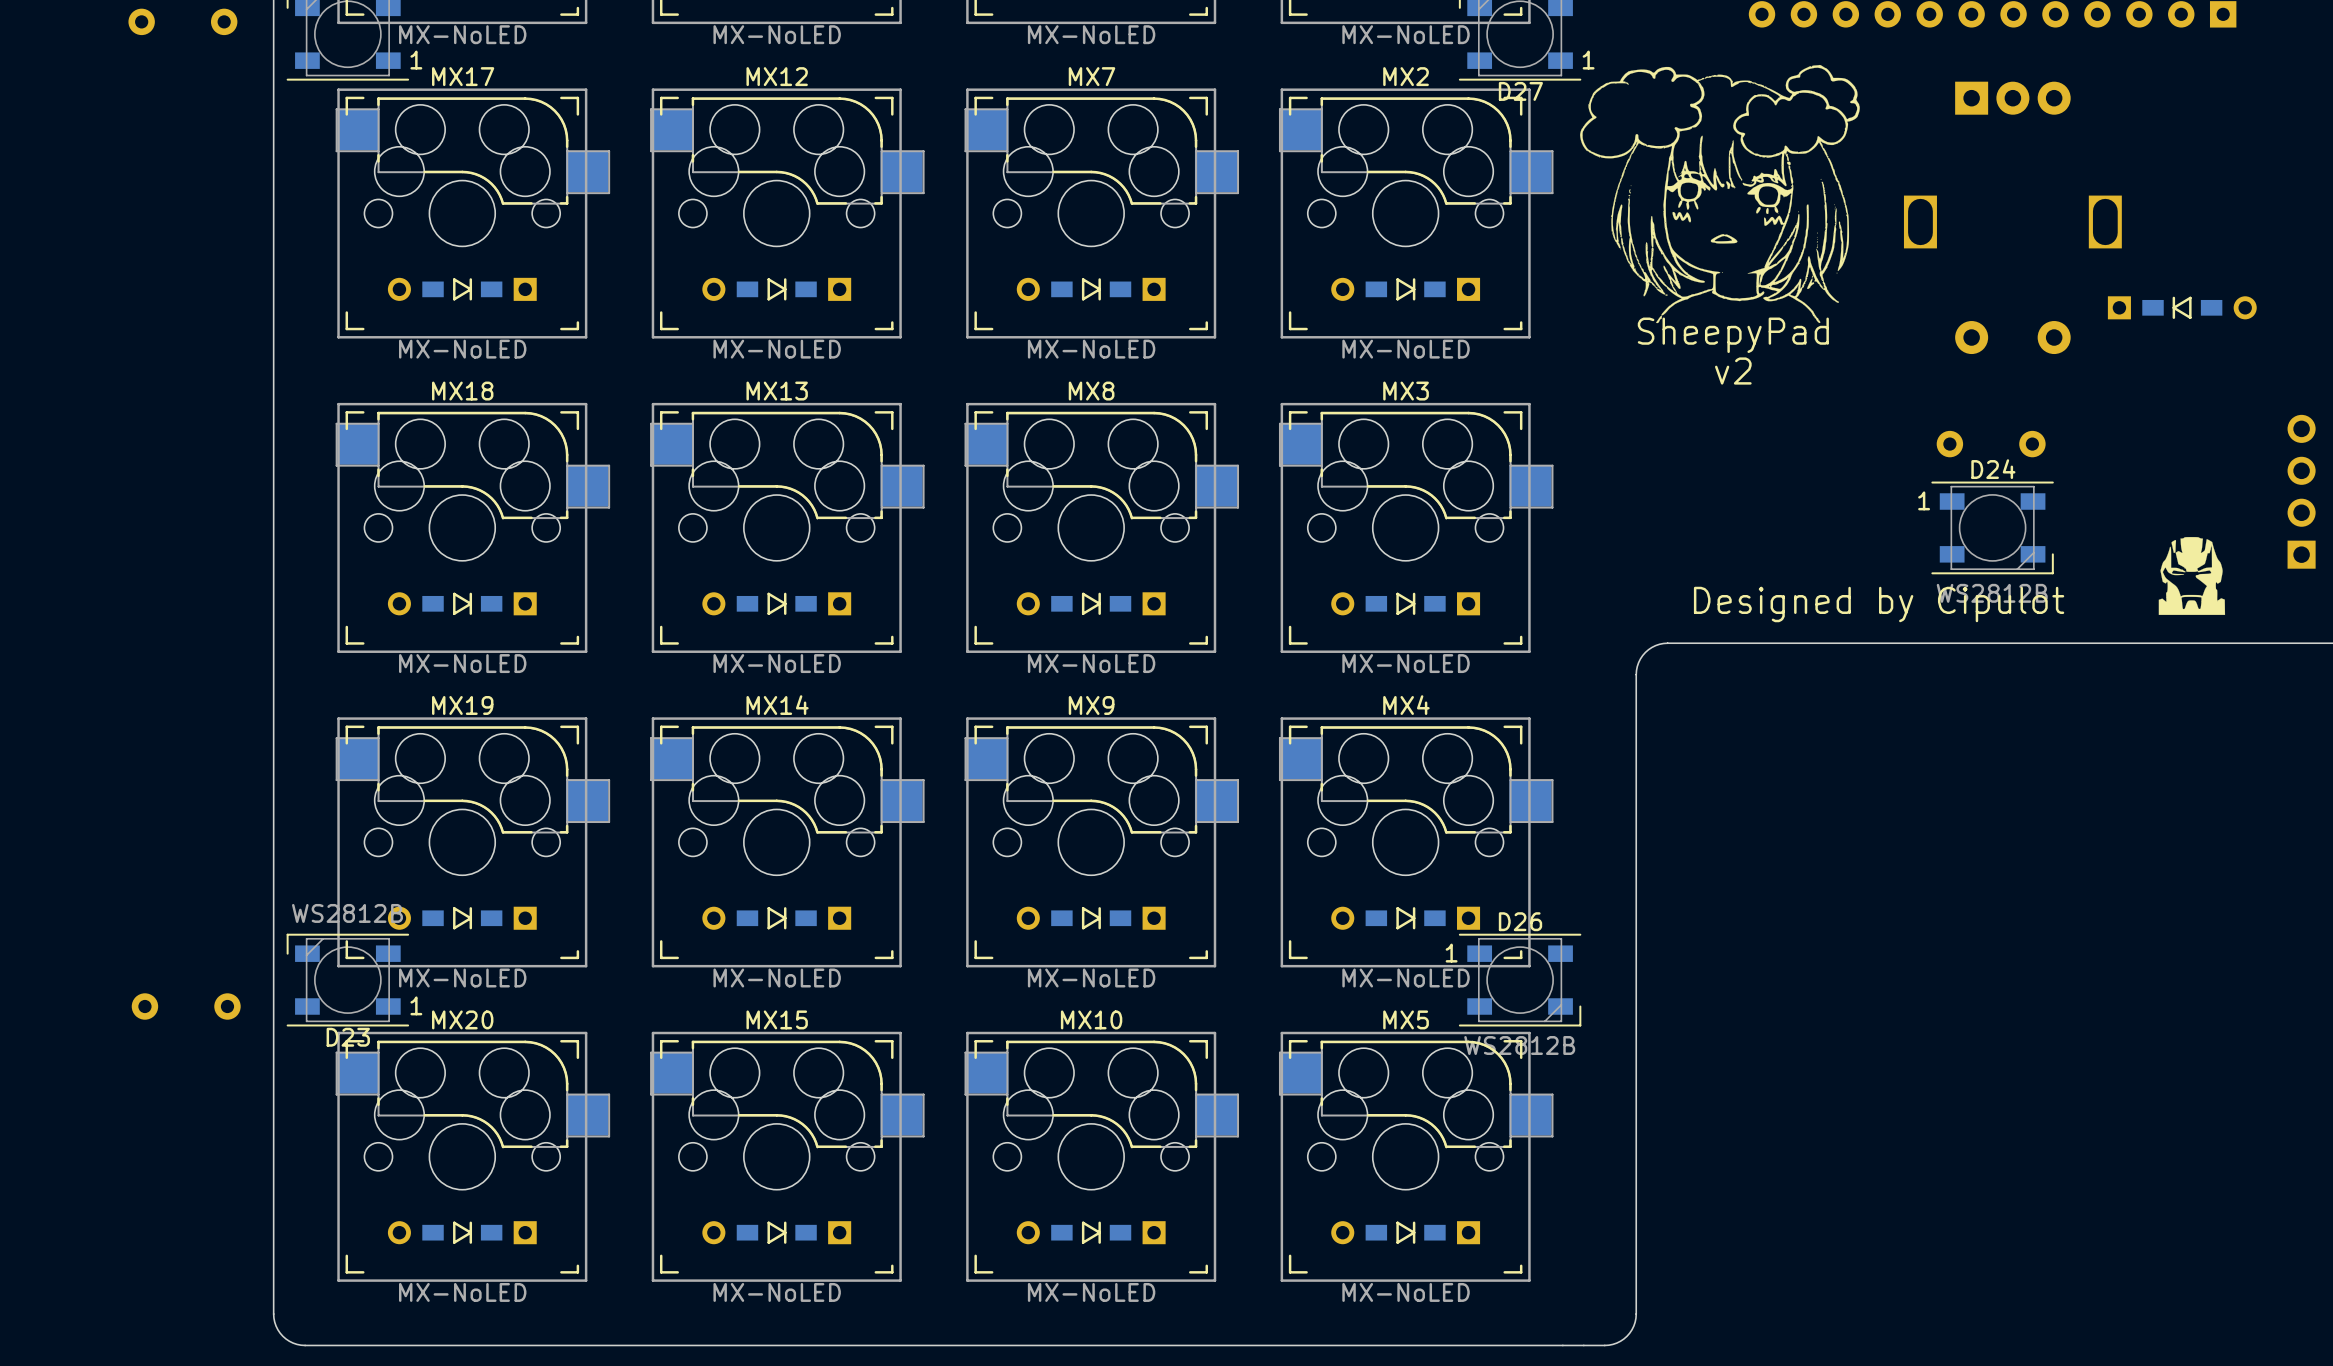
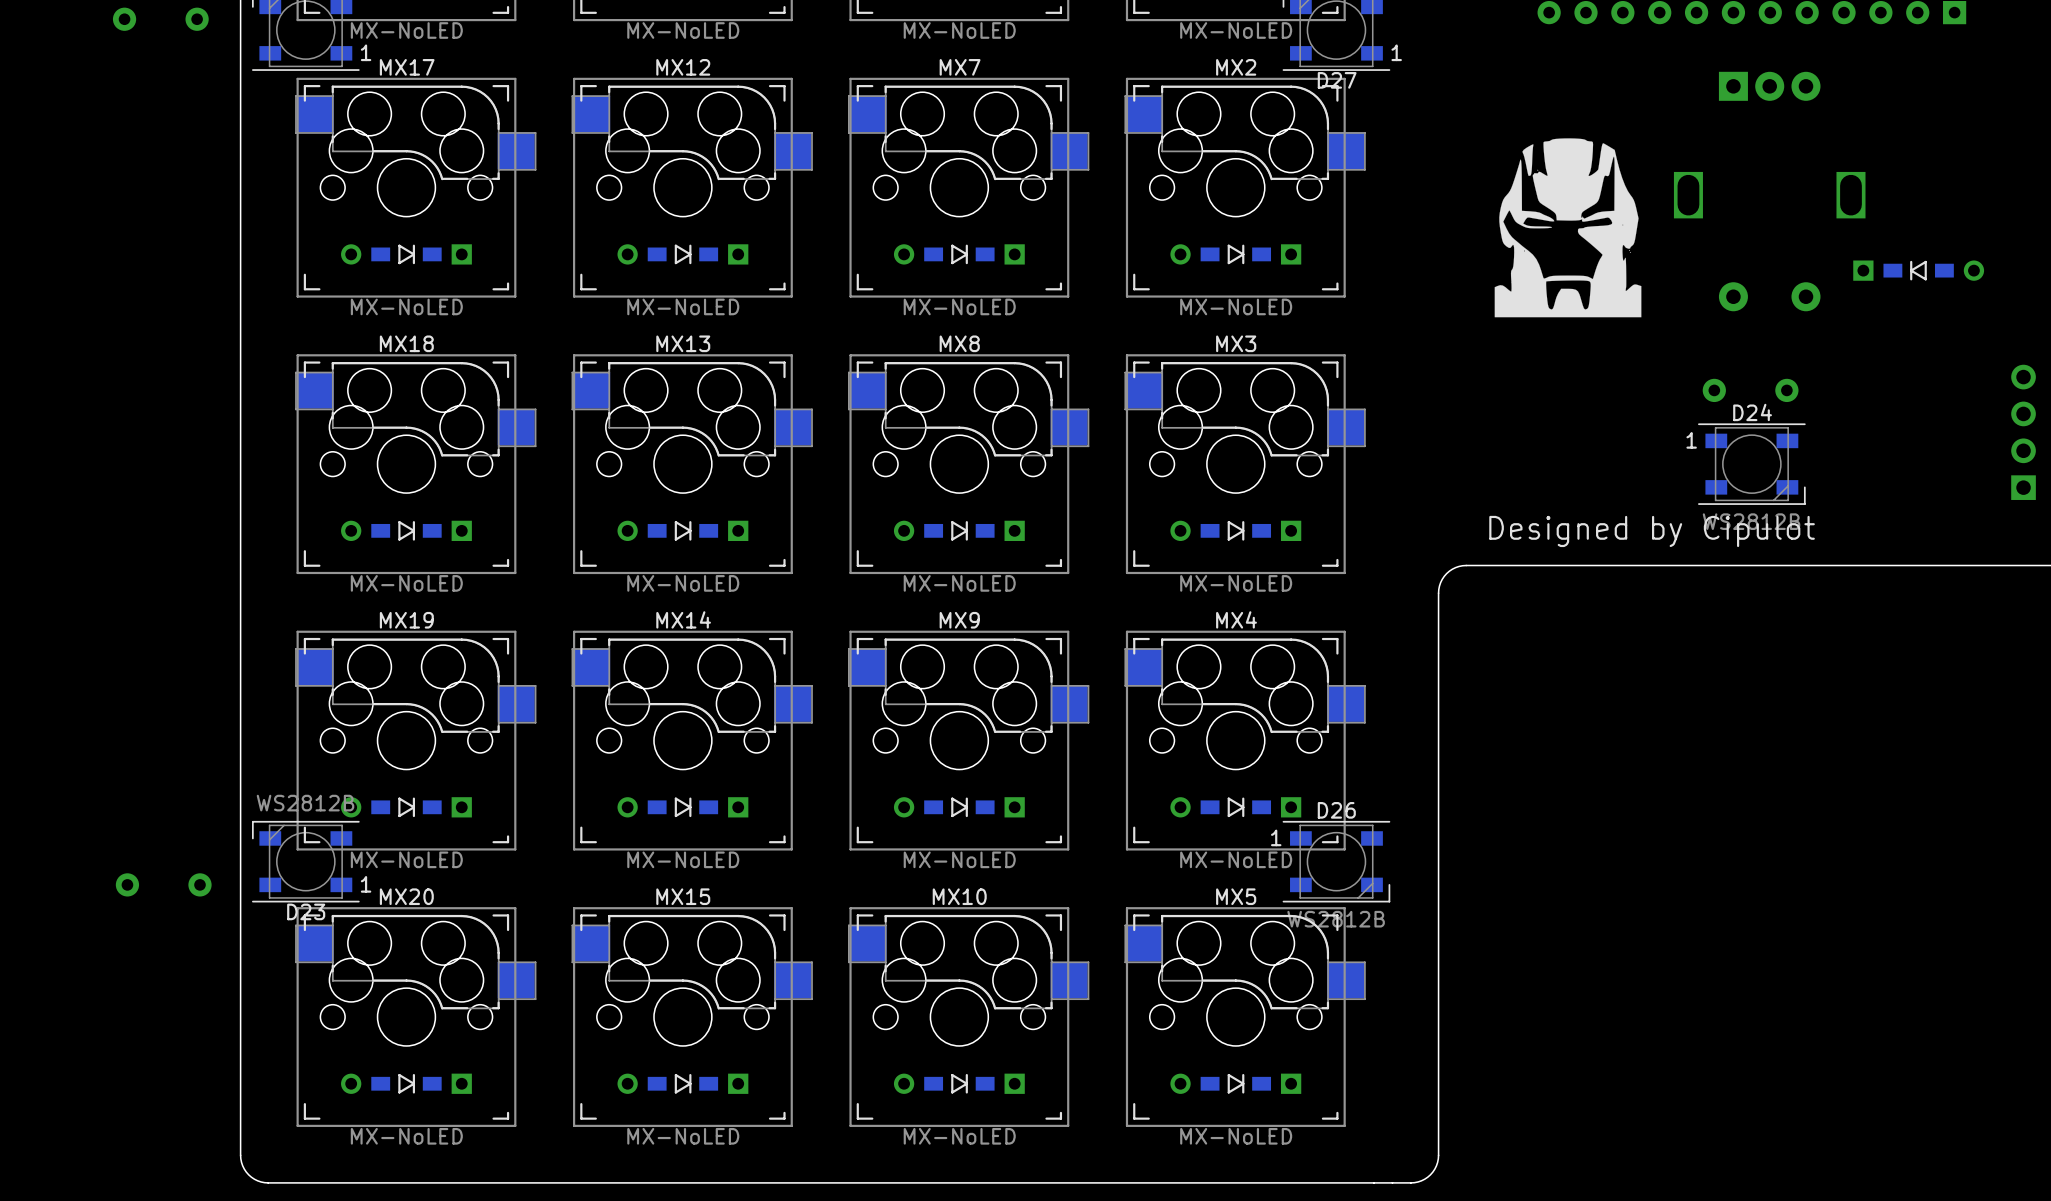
drawing: [1580, 64, 1860, 324] -> none
drawing: none -> [1494, 138, 1642, 318]
text: SheepyPad (1733, 335) -> none
text: v2 (1733, 371) -> none
drawing: [2158, 537, 2226, 615] -> none

